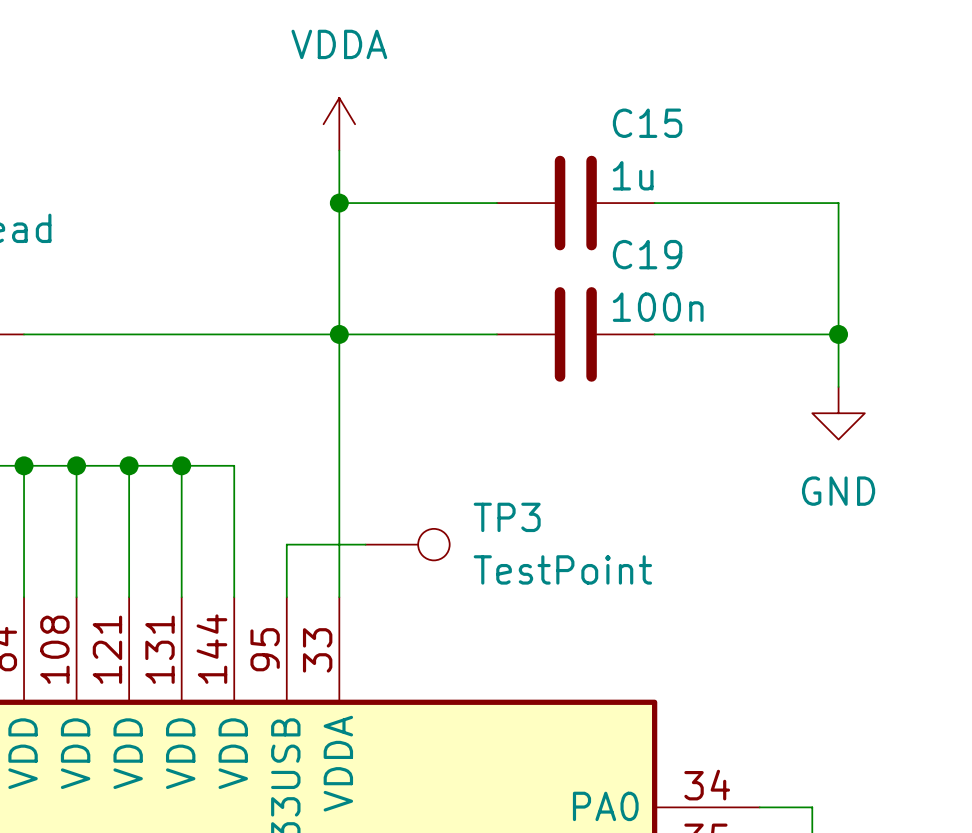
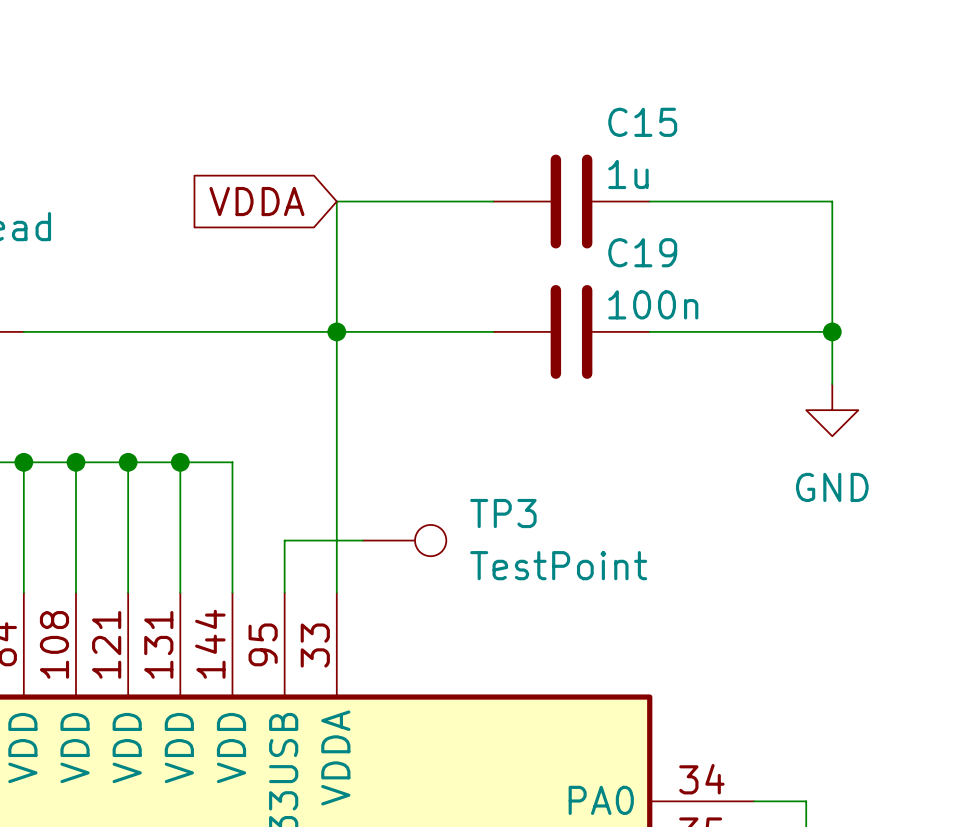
power symbol: VDDA (339, 124) -> none
wire: (339, 150) (339, 203) -> none
global label: none -> VDDA (256, 201)
junction: (339, 203) -> none

